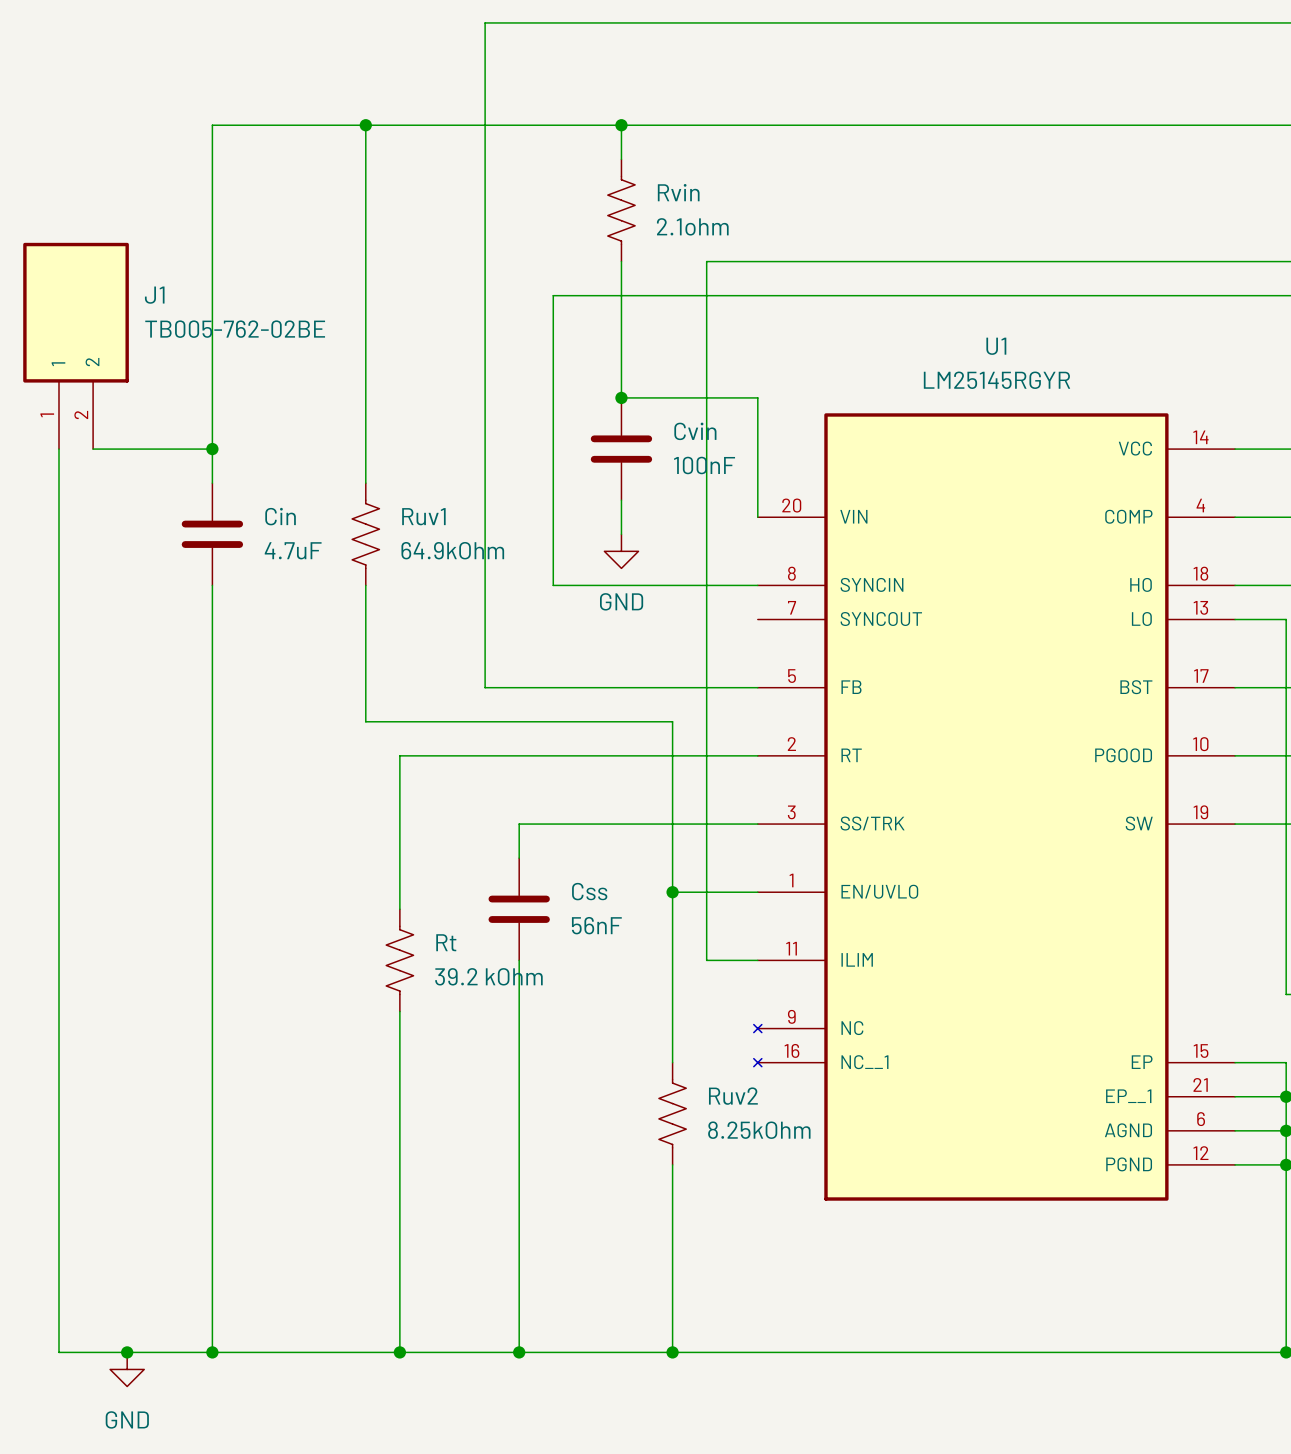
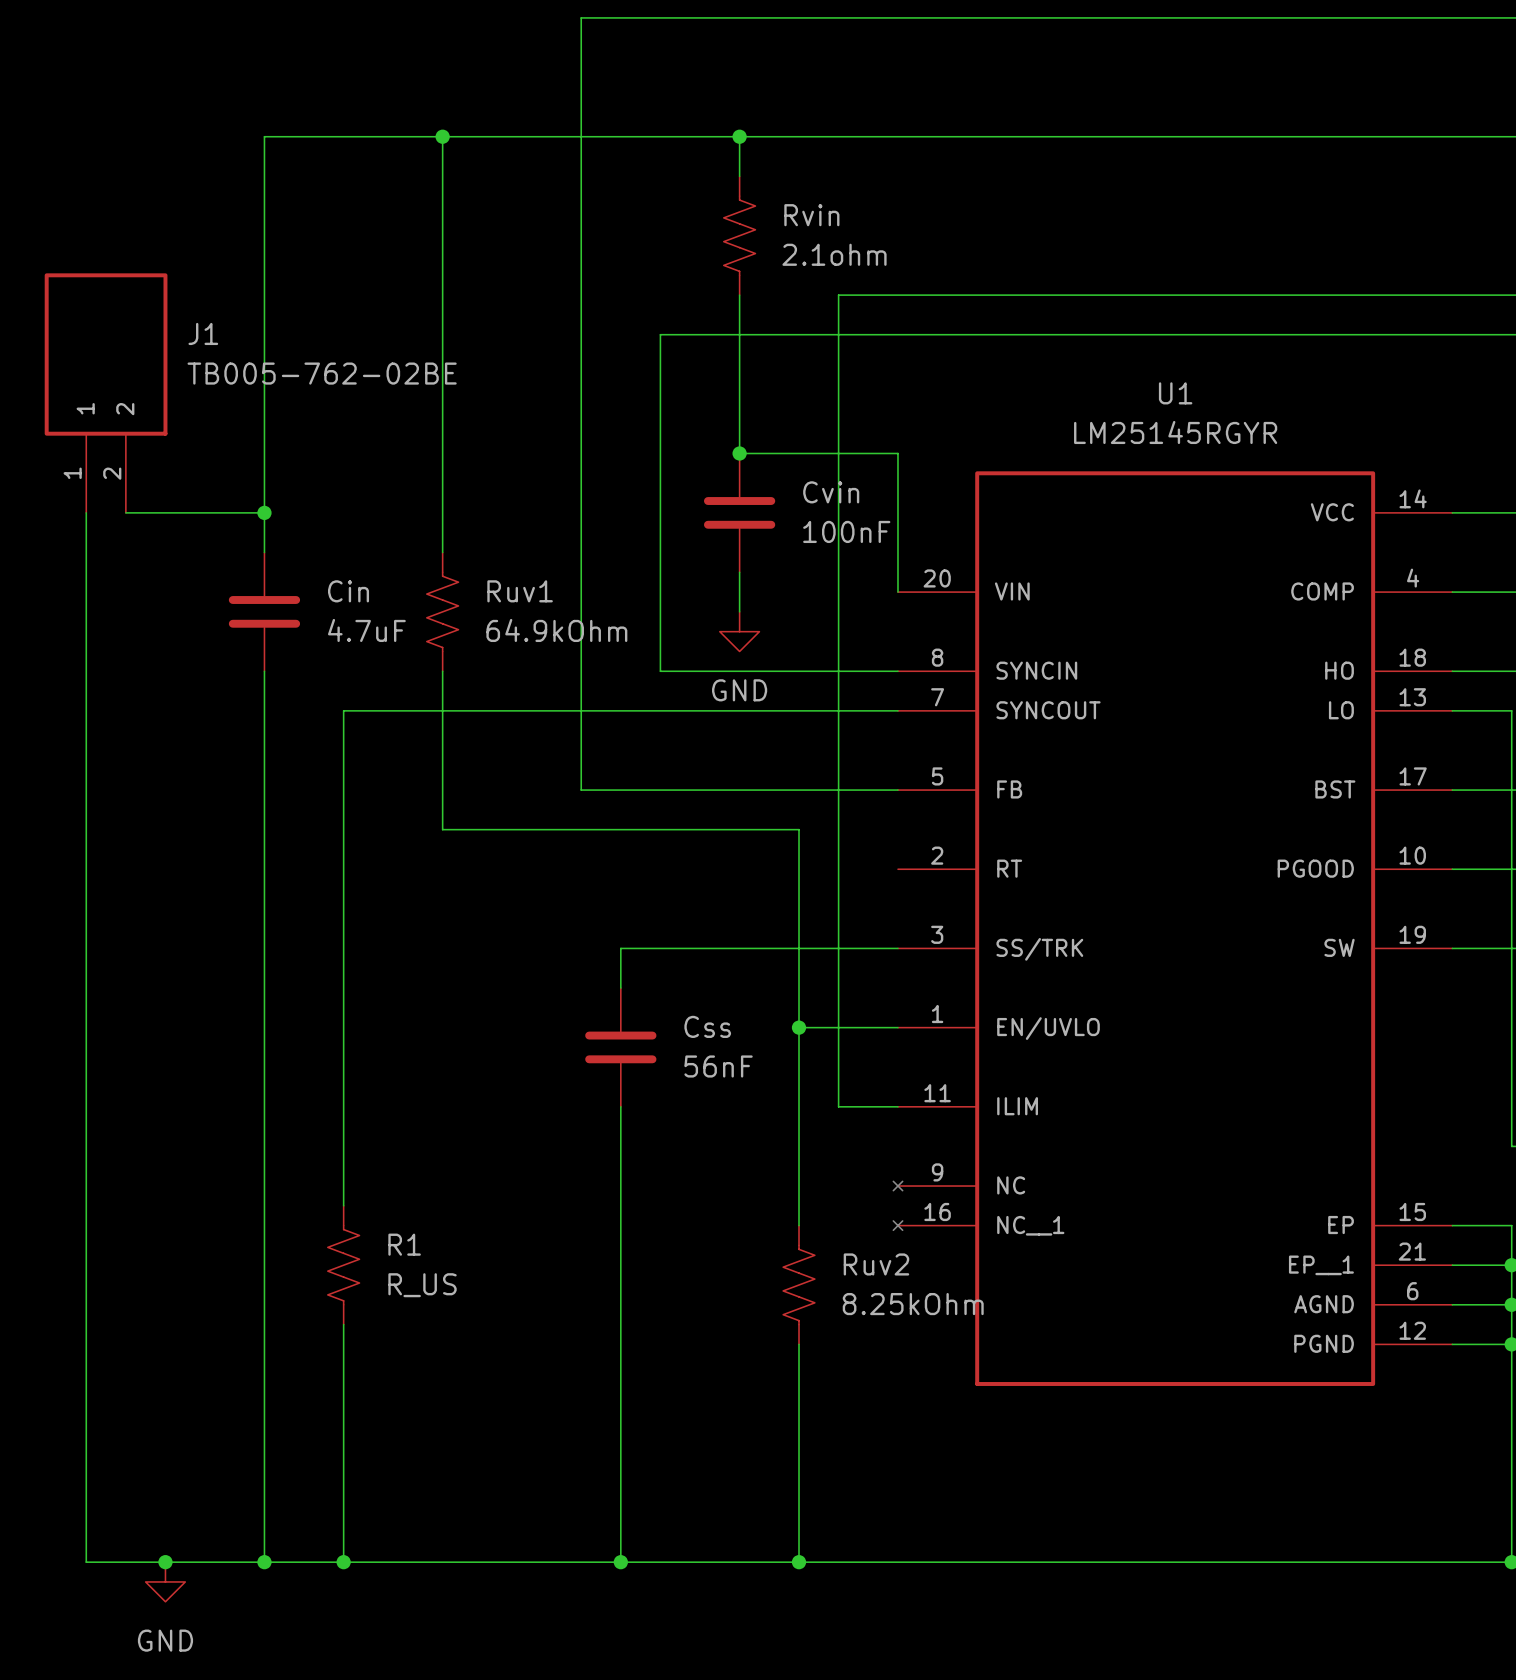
wire: none -> (897, 710) (343, 710) (343, 1205)
wire: (757, 755) (399, 755) (399, 909) -> none
Rt: 39.2 kOhm (399, 960) -> none
wire: (399, 1011) (399, 1352) -> none
R1: none -> R_US (343, 1265)
wire: none -> (343, 1324) (343, 1562)
junction: none -> (343, 1562)
junction: (399, 1352) -> none

